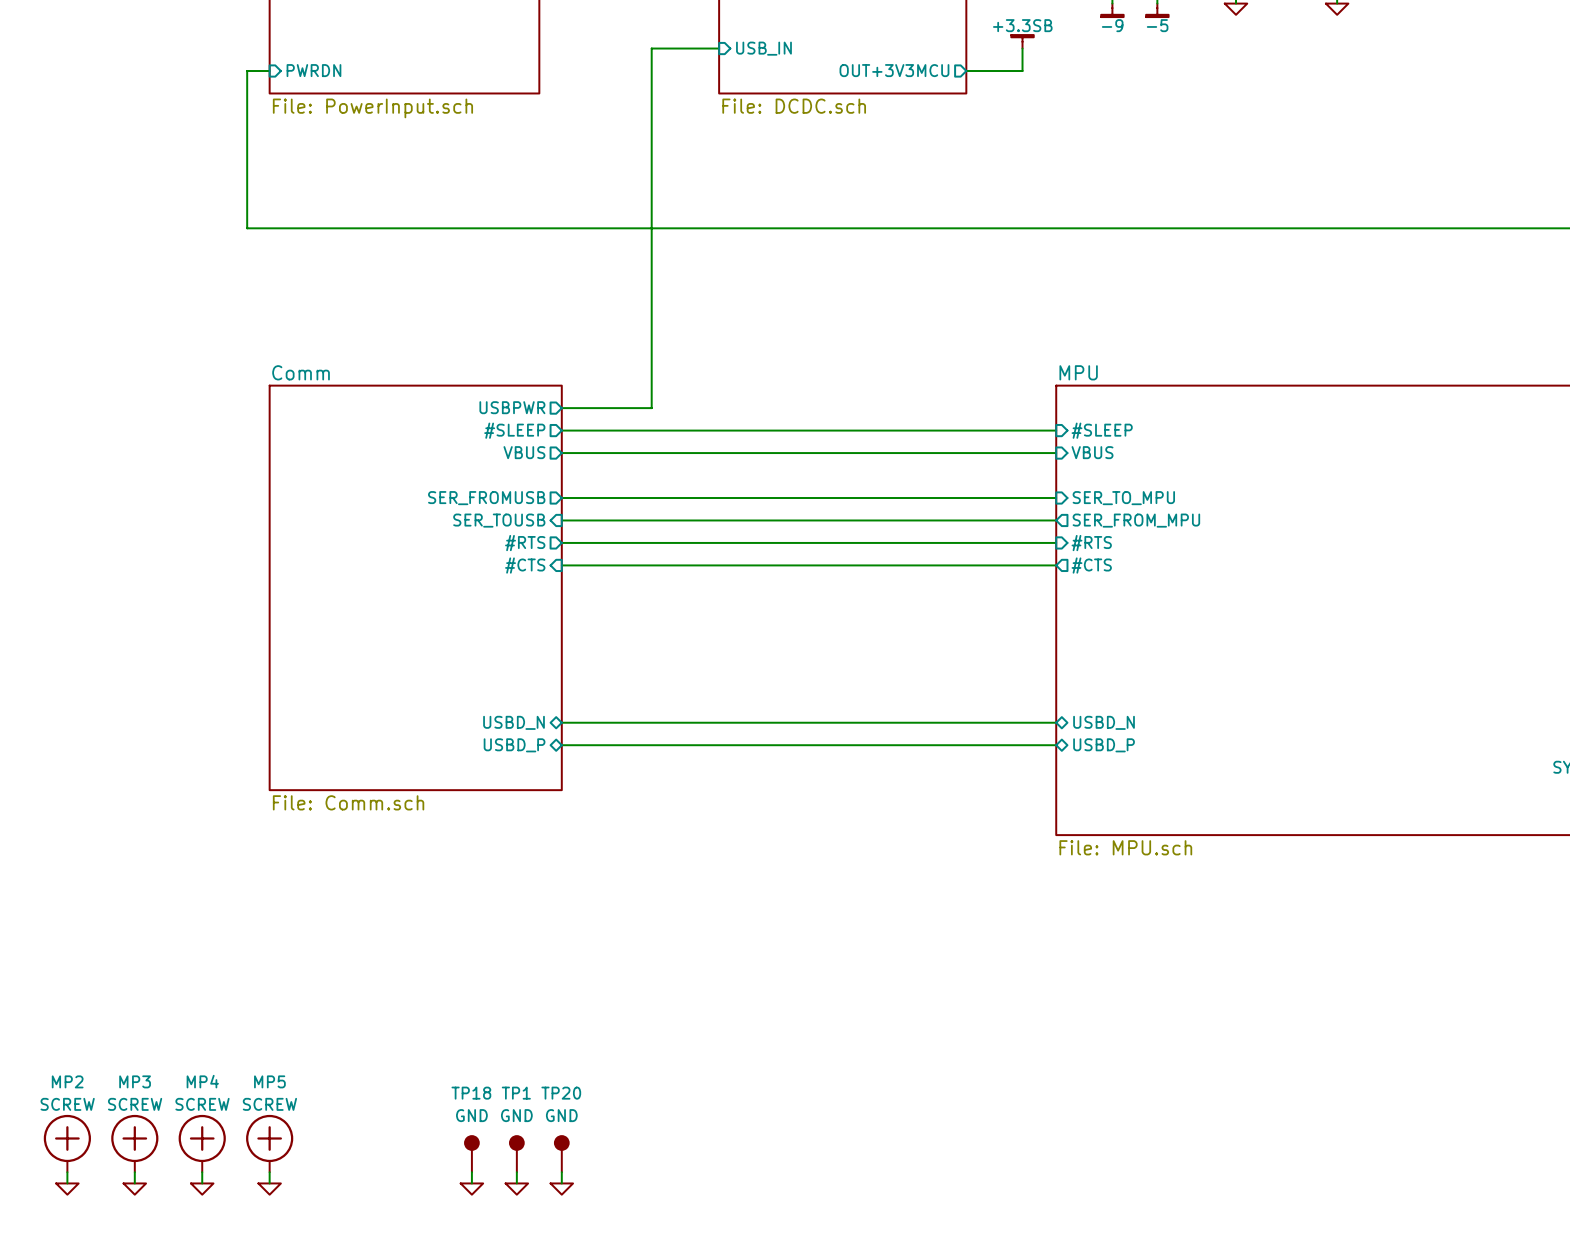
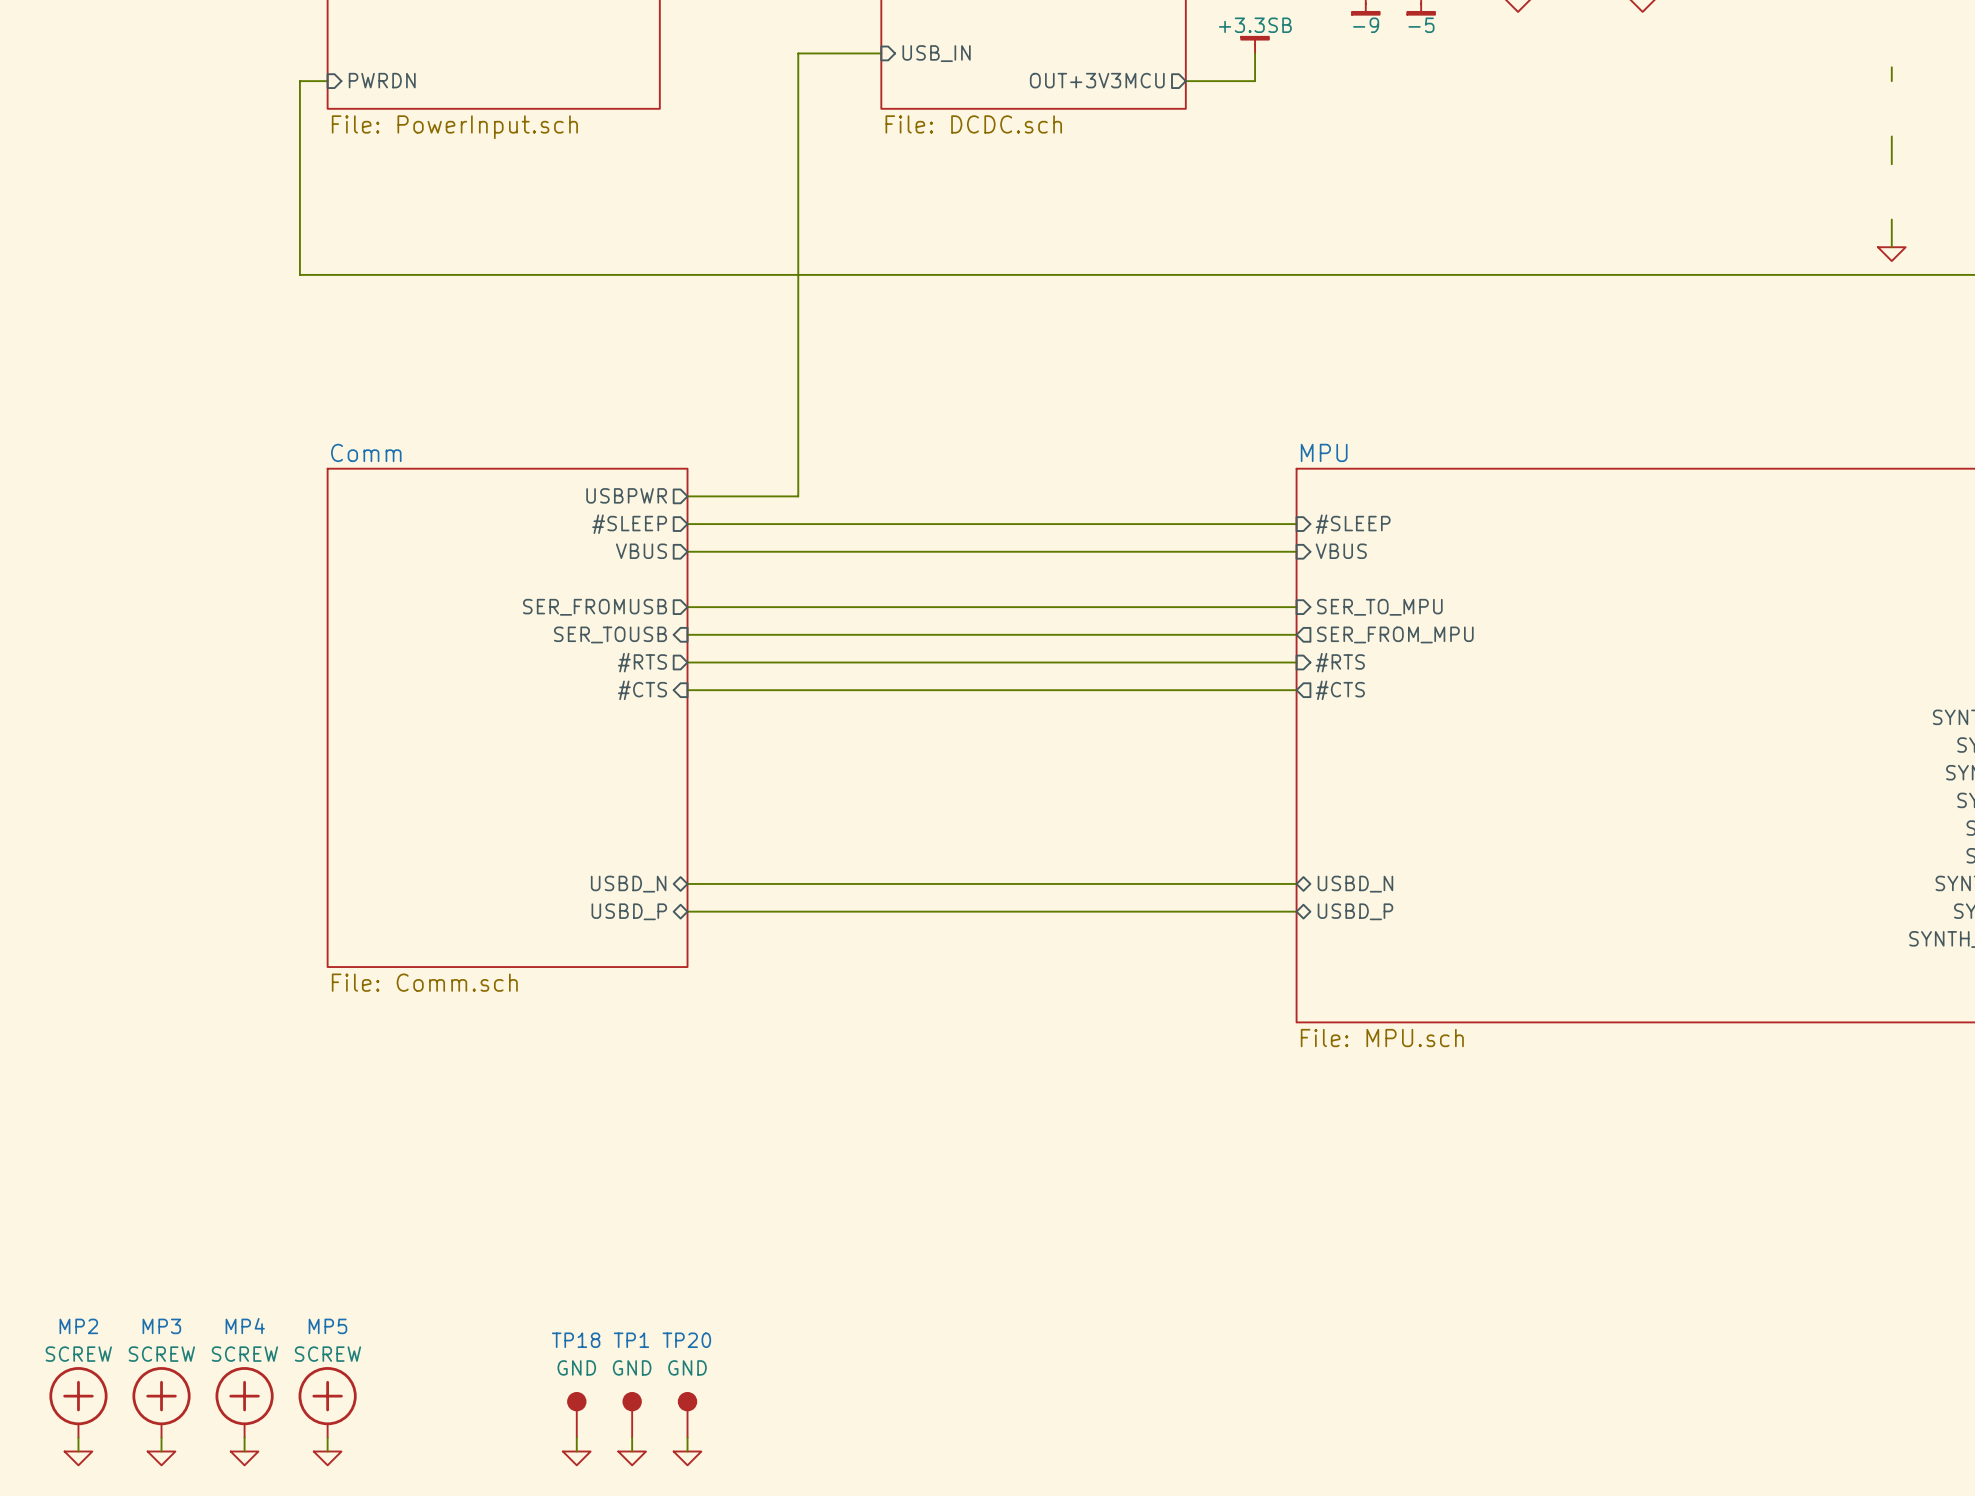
wire: none -> (1891, 67) (1891, 81)
wire: none -> (1891, 136) (1891, 164)
wire: none -> (1891, 219) (1891, 247)
power symbol: none -> (1891, 254)

